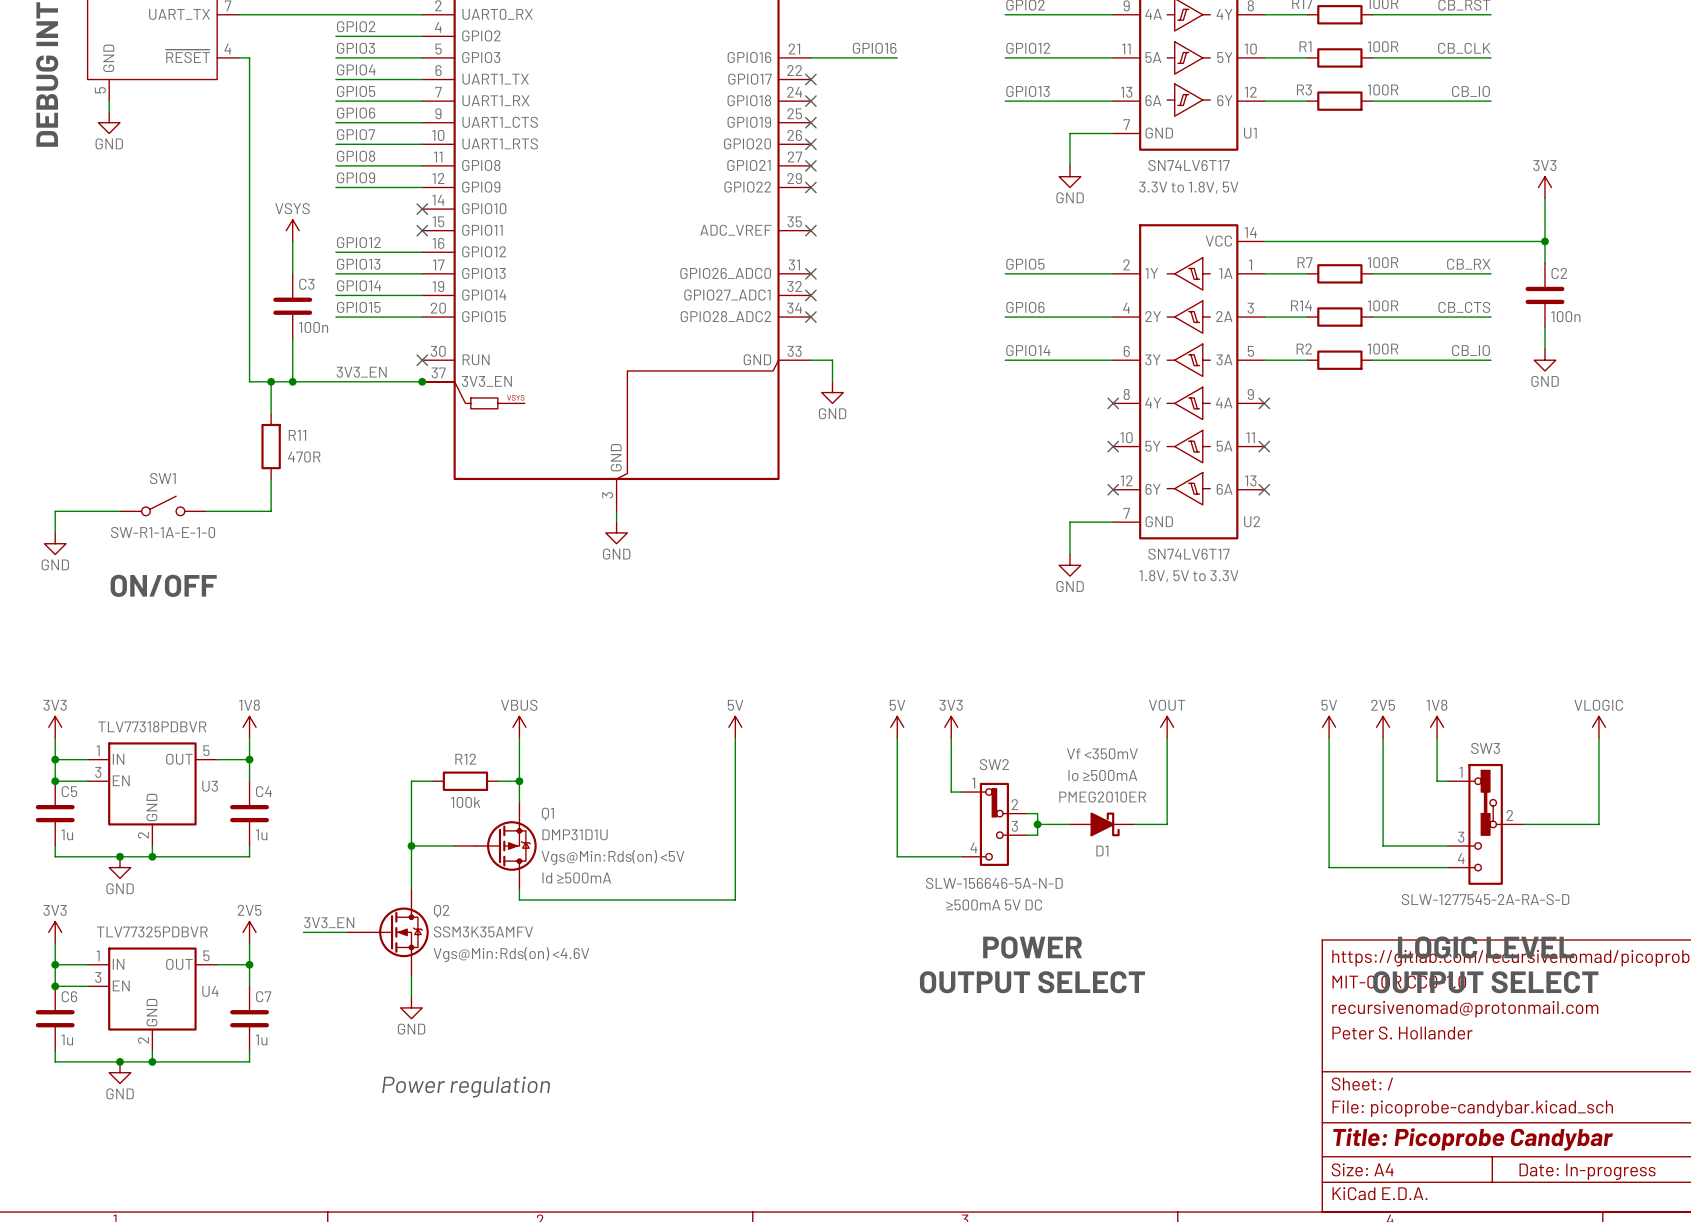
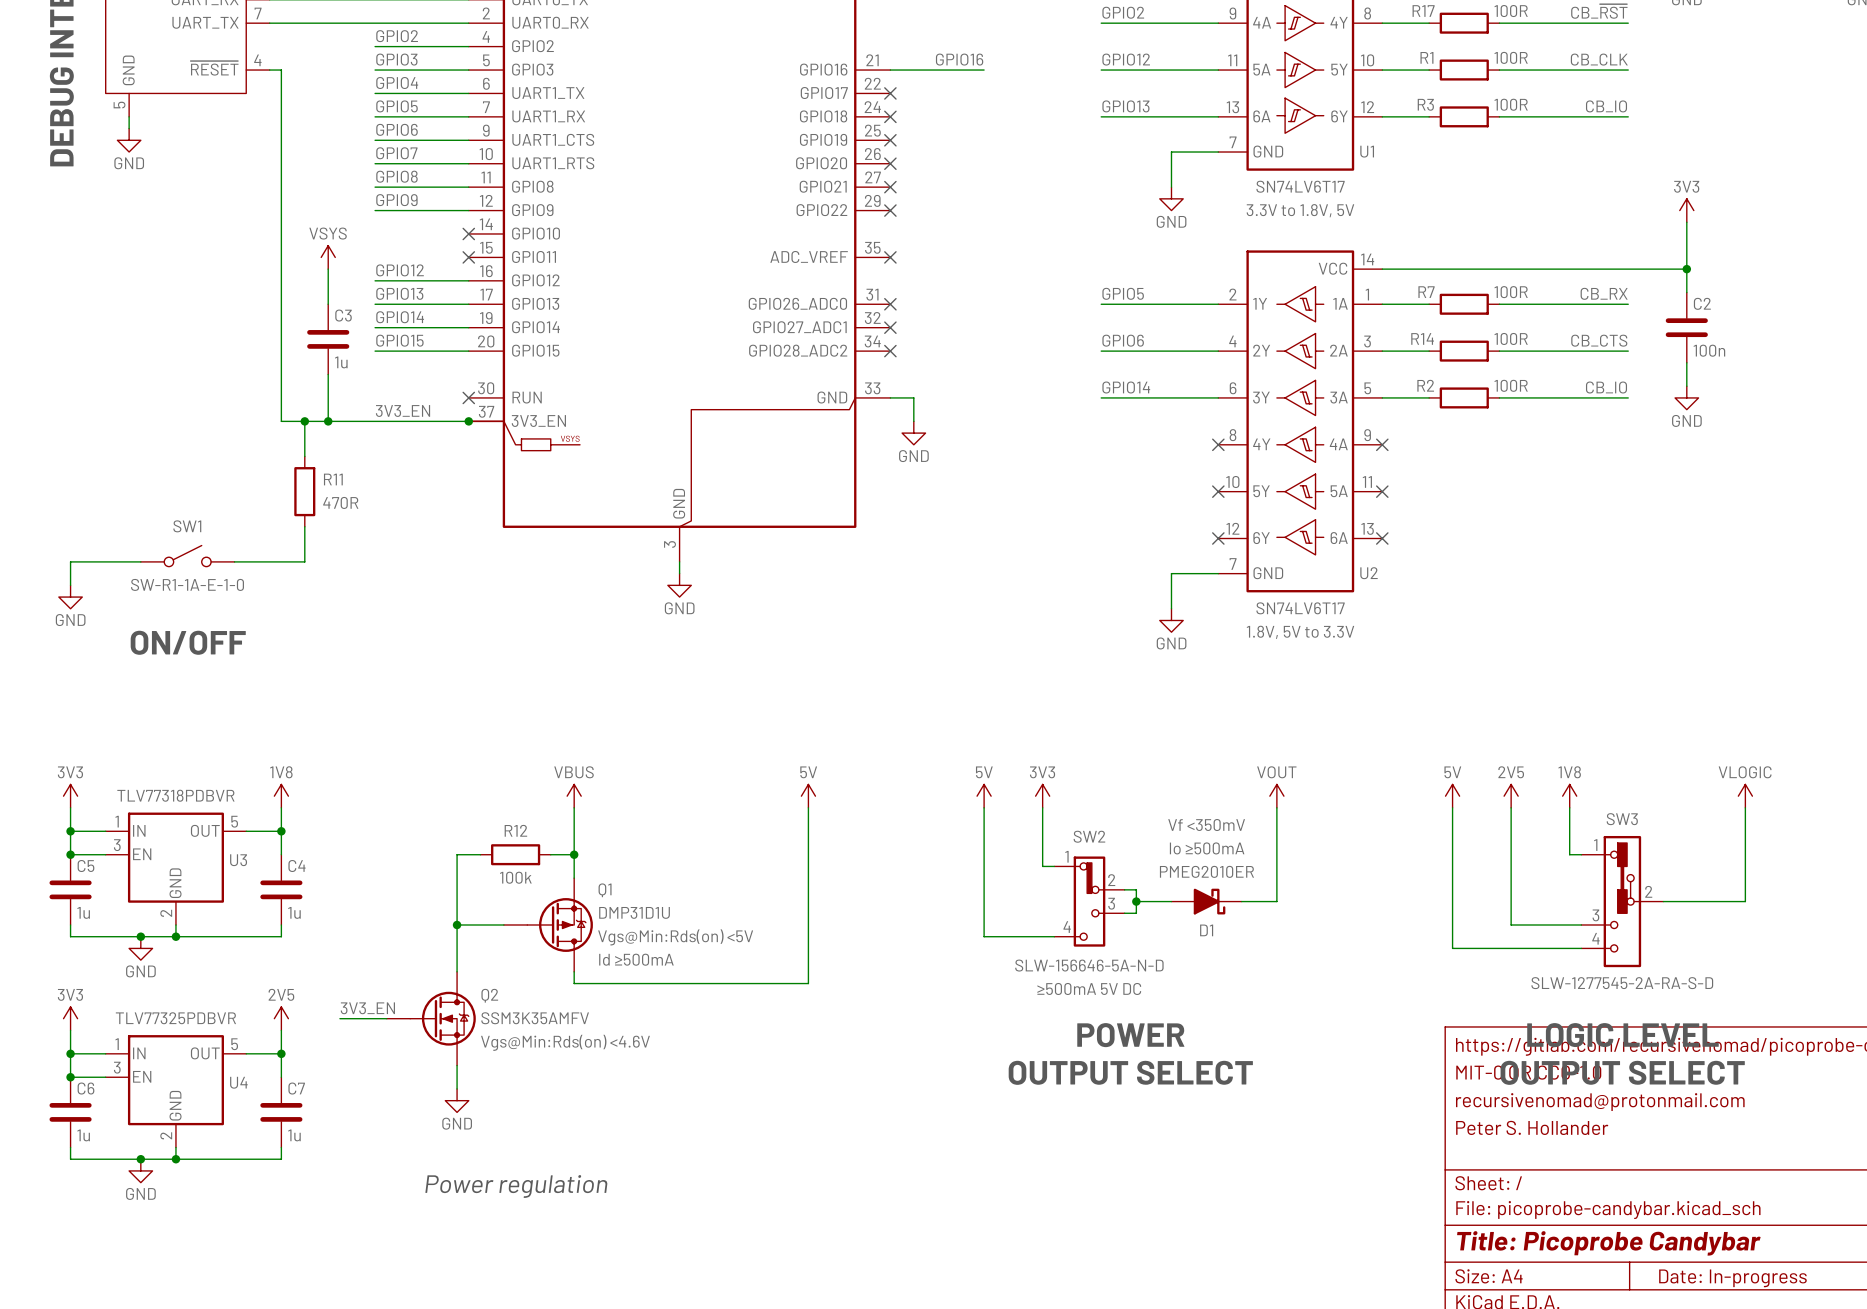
C3 value: 100n (313, 327) -> 1u (341, 362)

